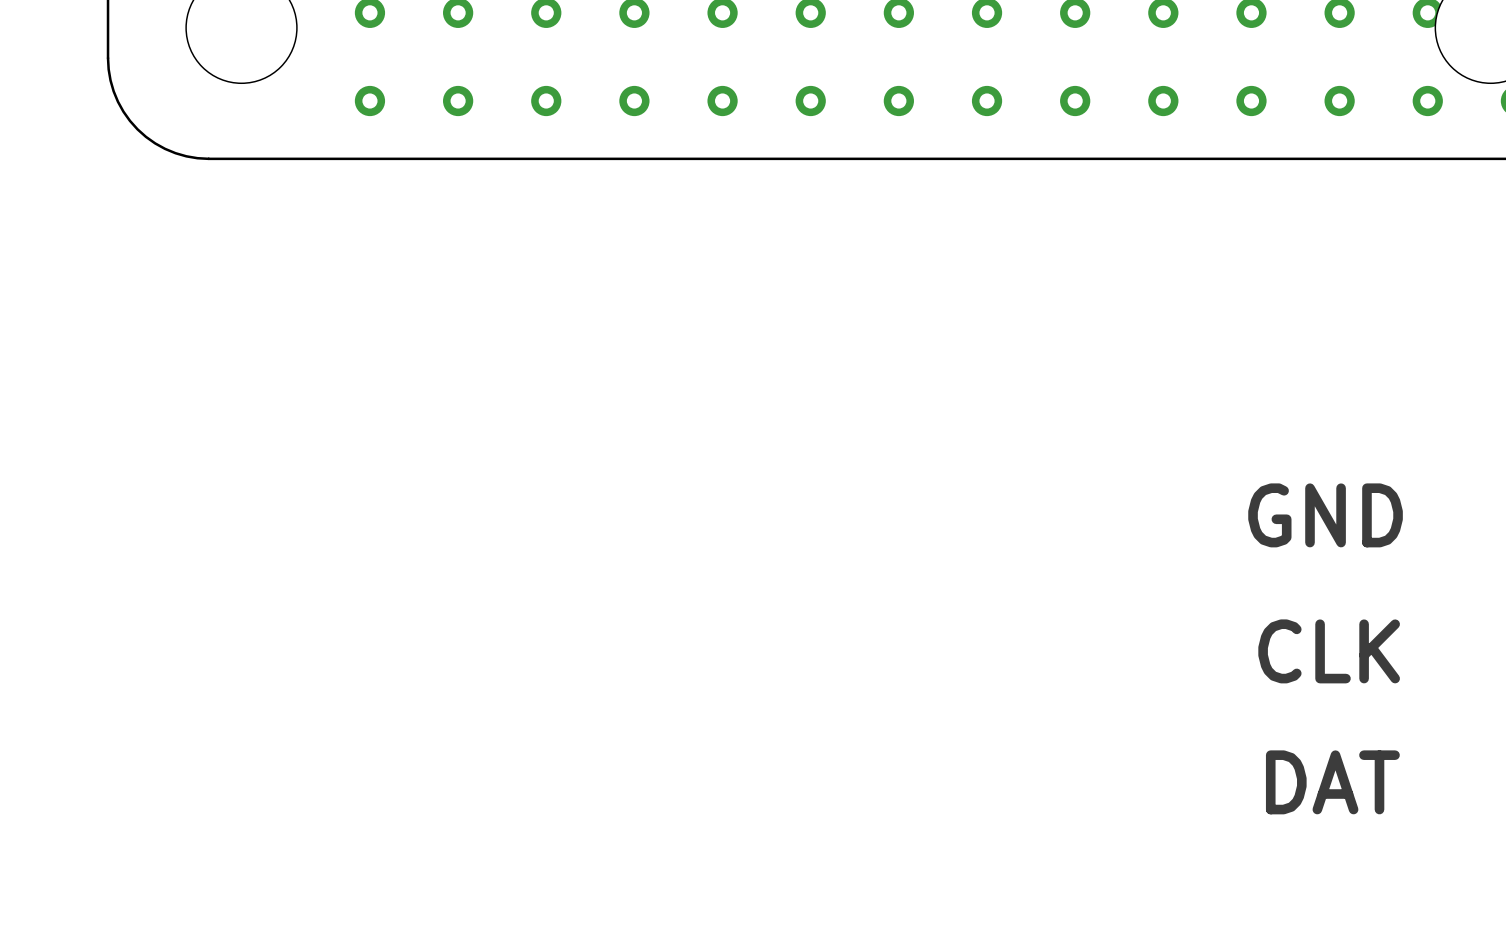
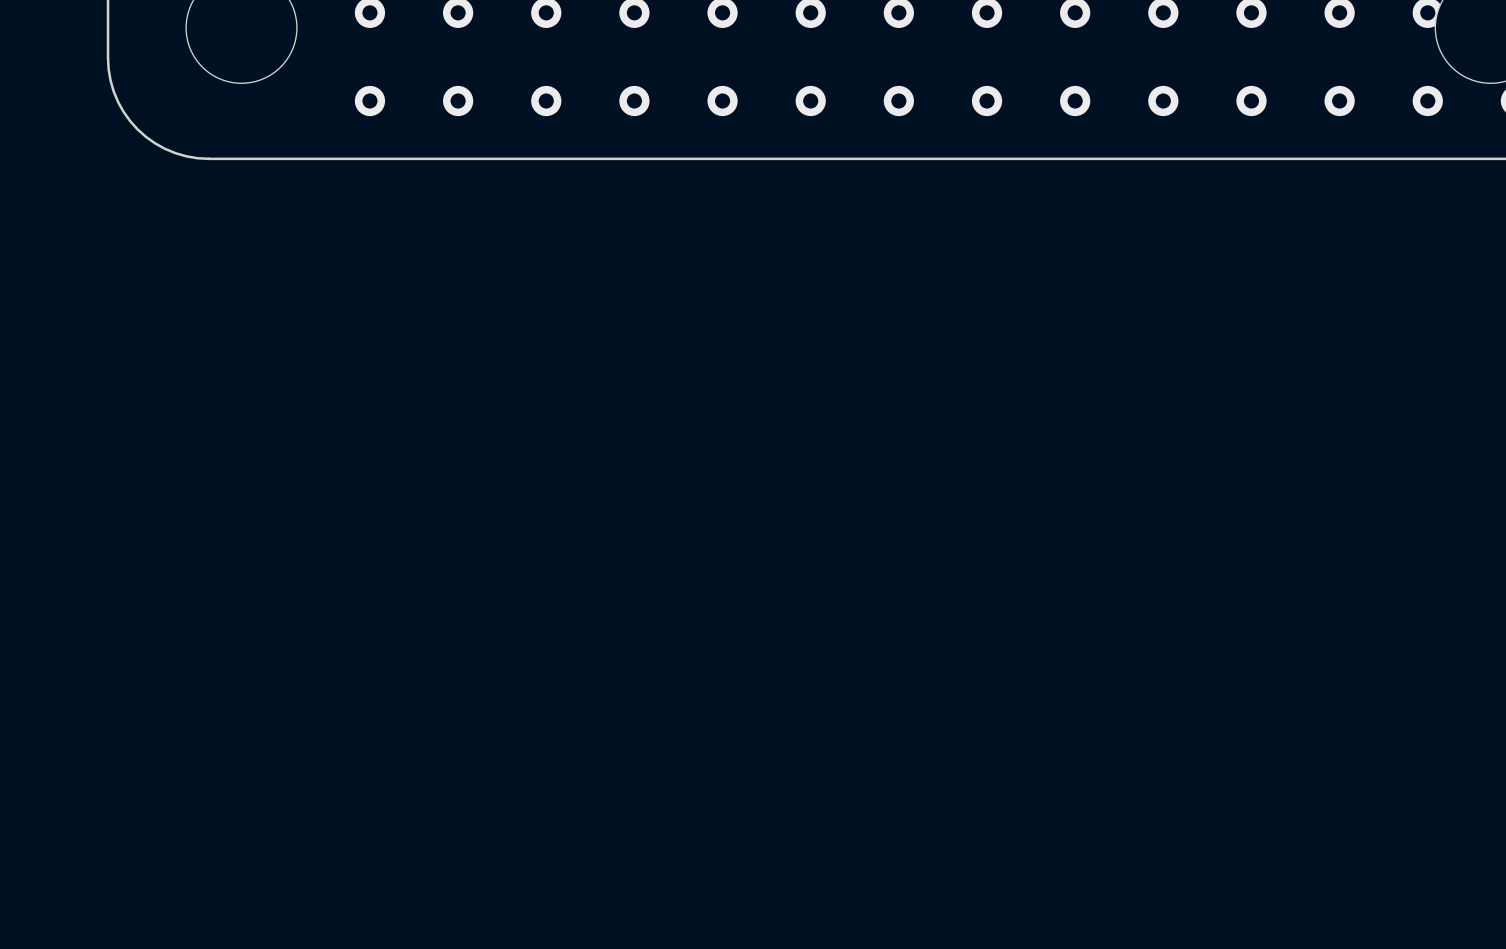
text: GND (1325, 515) -> none
text: CLK (1329, 651) -> none
text: DAT (1332, 782) -> none

